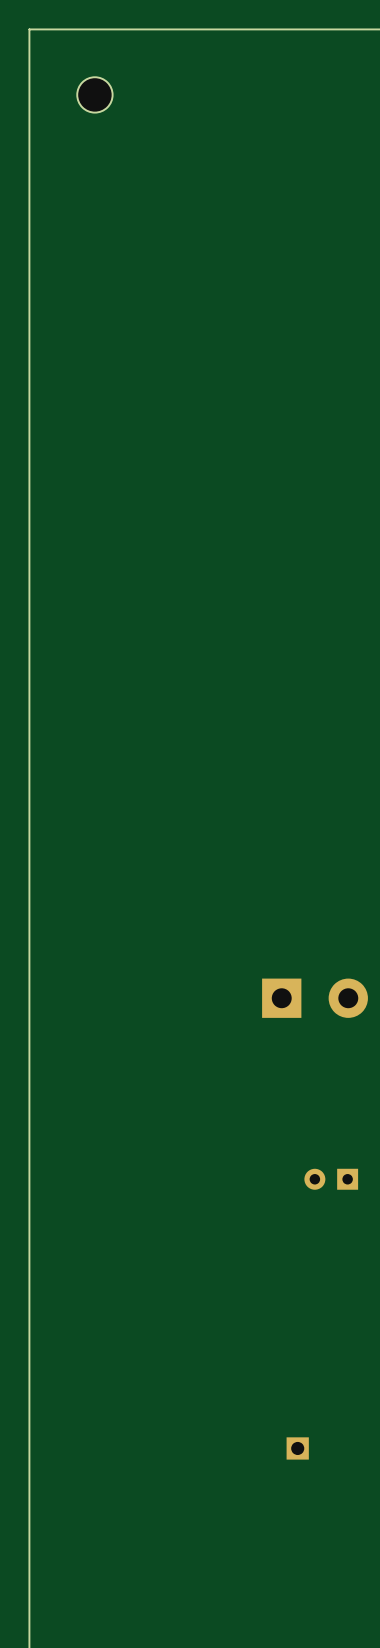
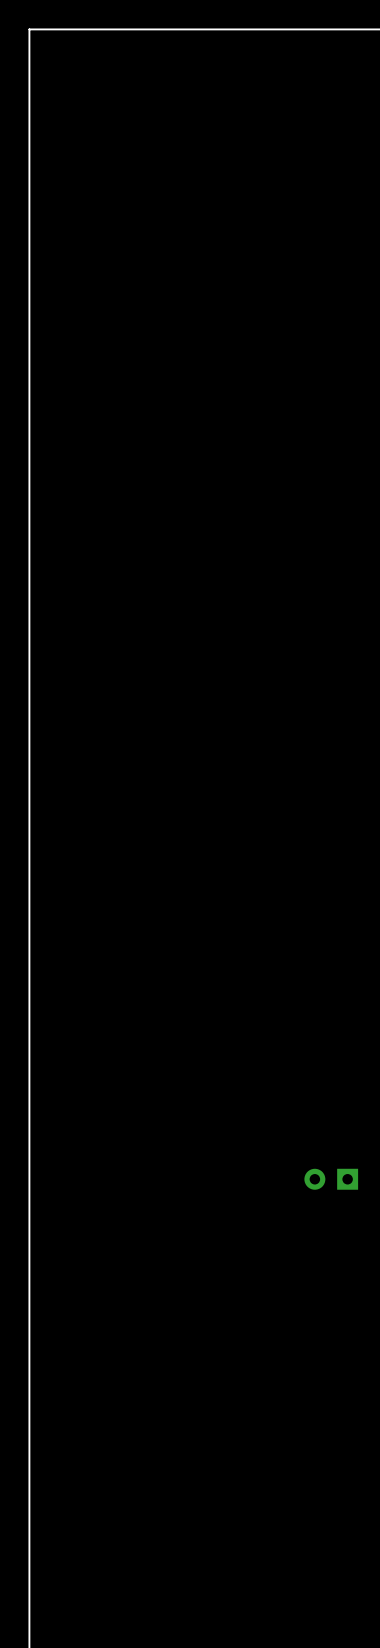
part: (94, 94) -> none
part: (315, 998) -> none
part: (297, 1448) -> none

